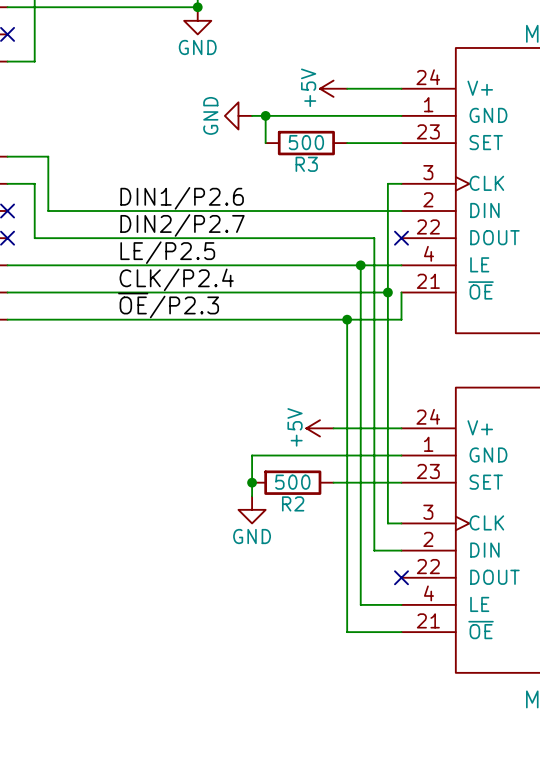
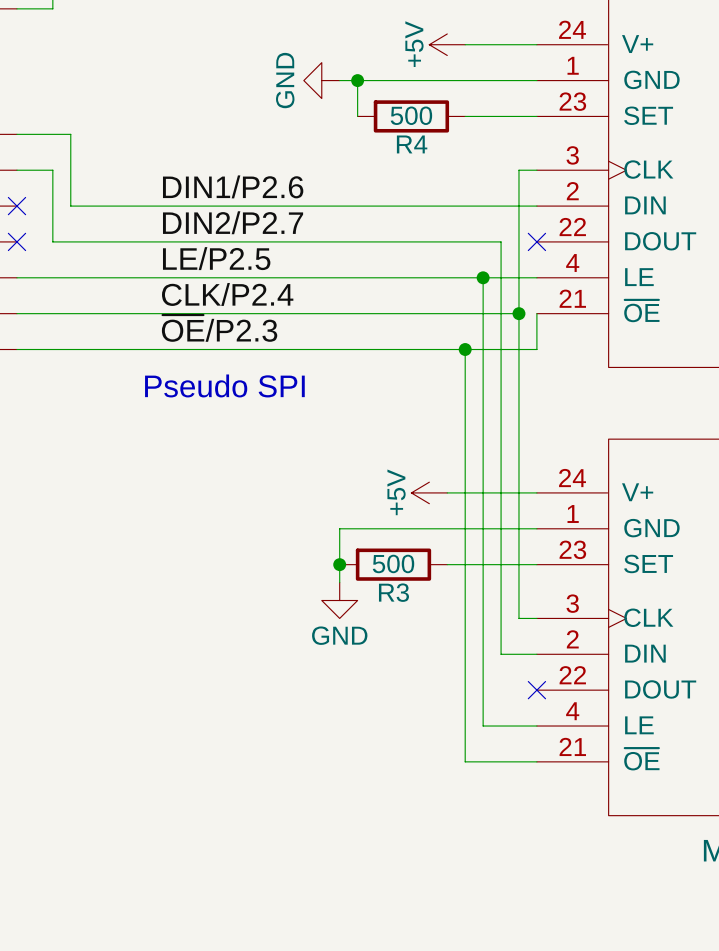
R3 name: R3 (306, 164) -> R4 (412, 144)
text: none -> Pseudo SPI (224, 385)
R2 name: R2 (293, 503) -> R3 (393, 592)

